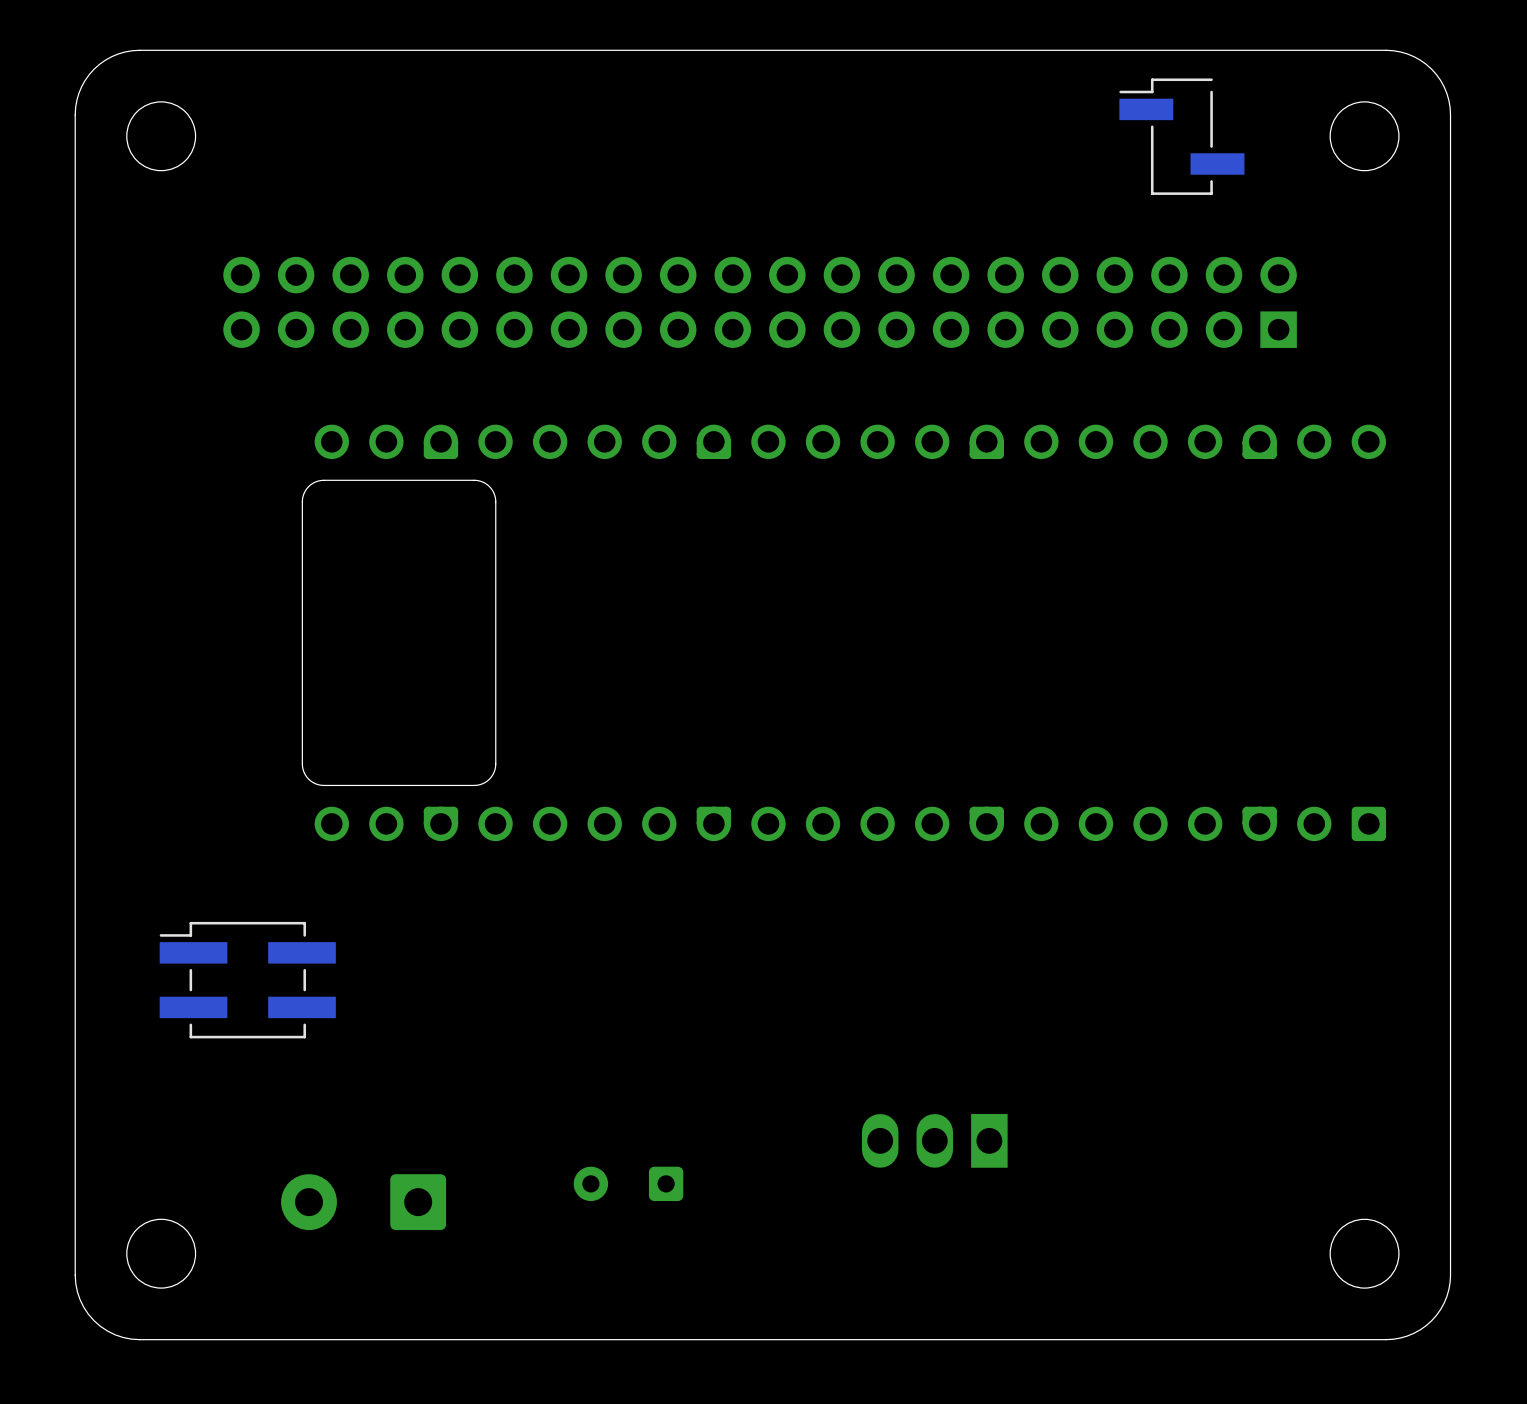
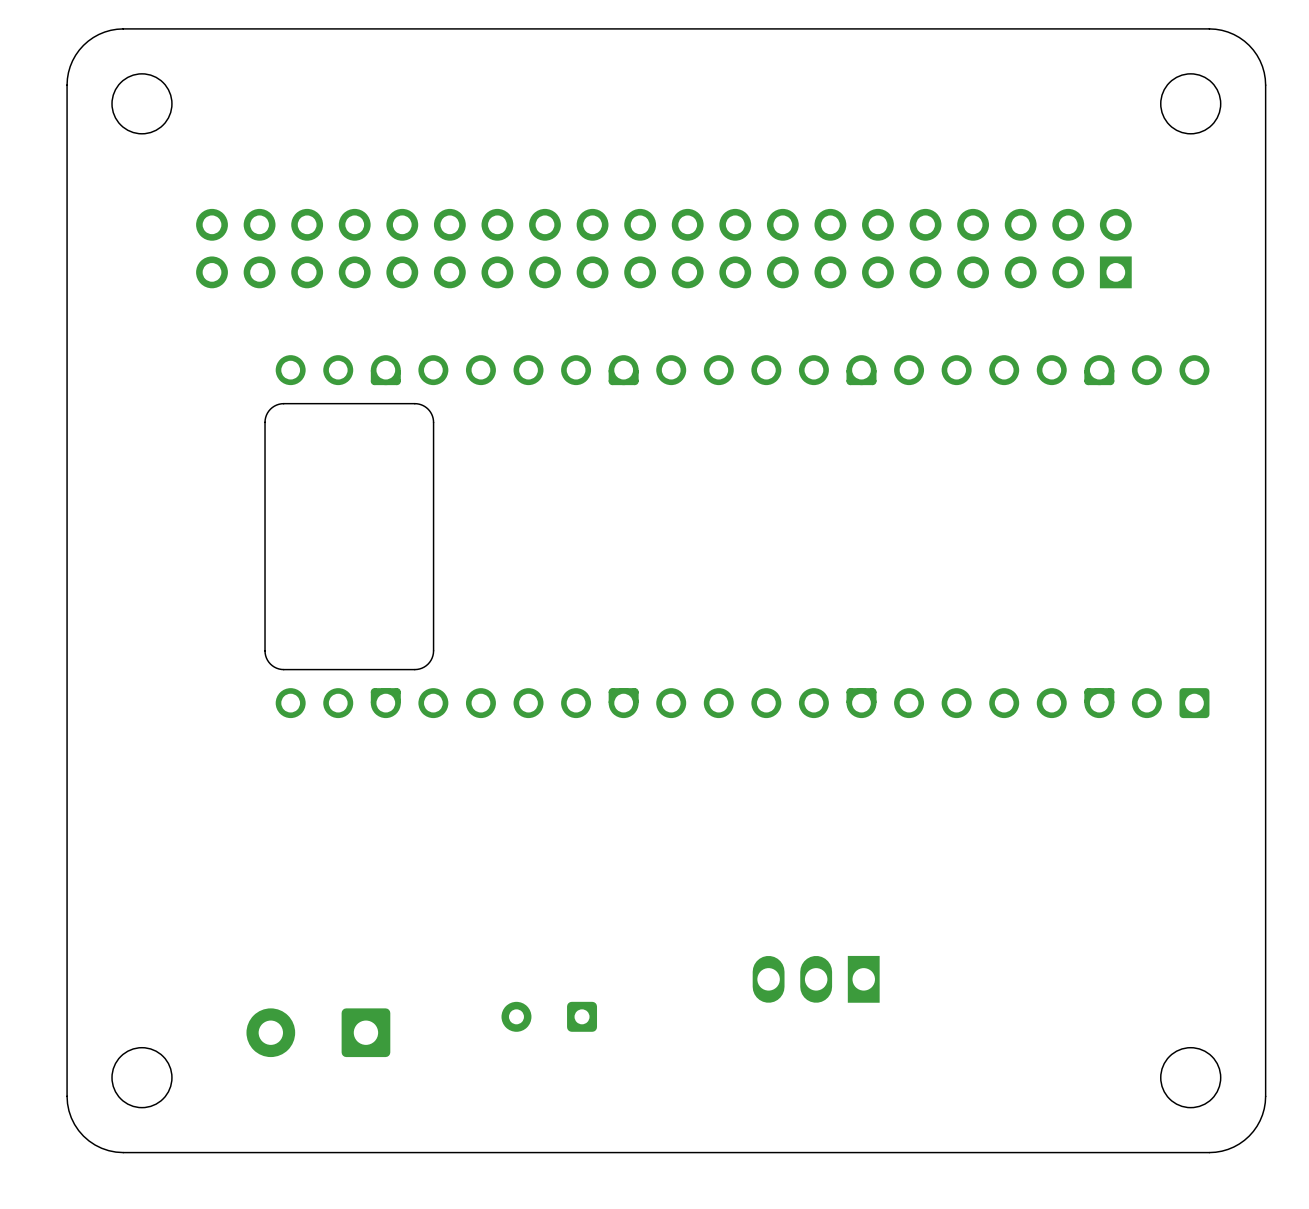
part: (1181, 136) -> none
part: (247, 980) -> none

